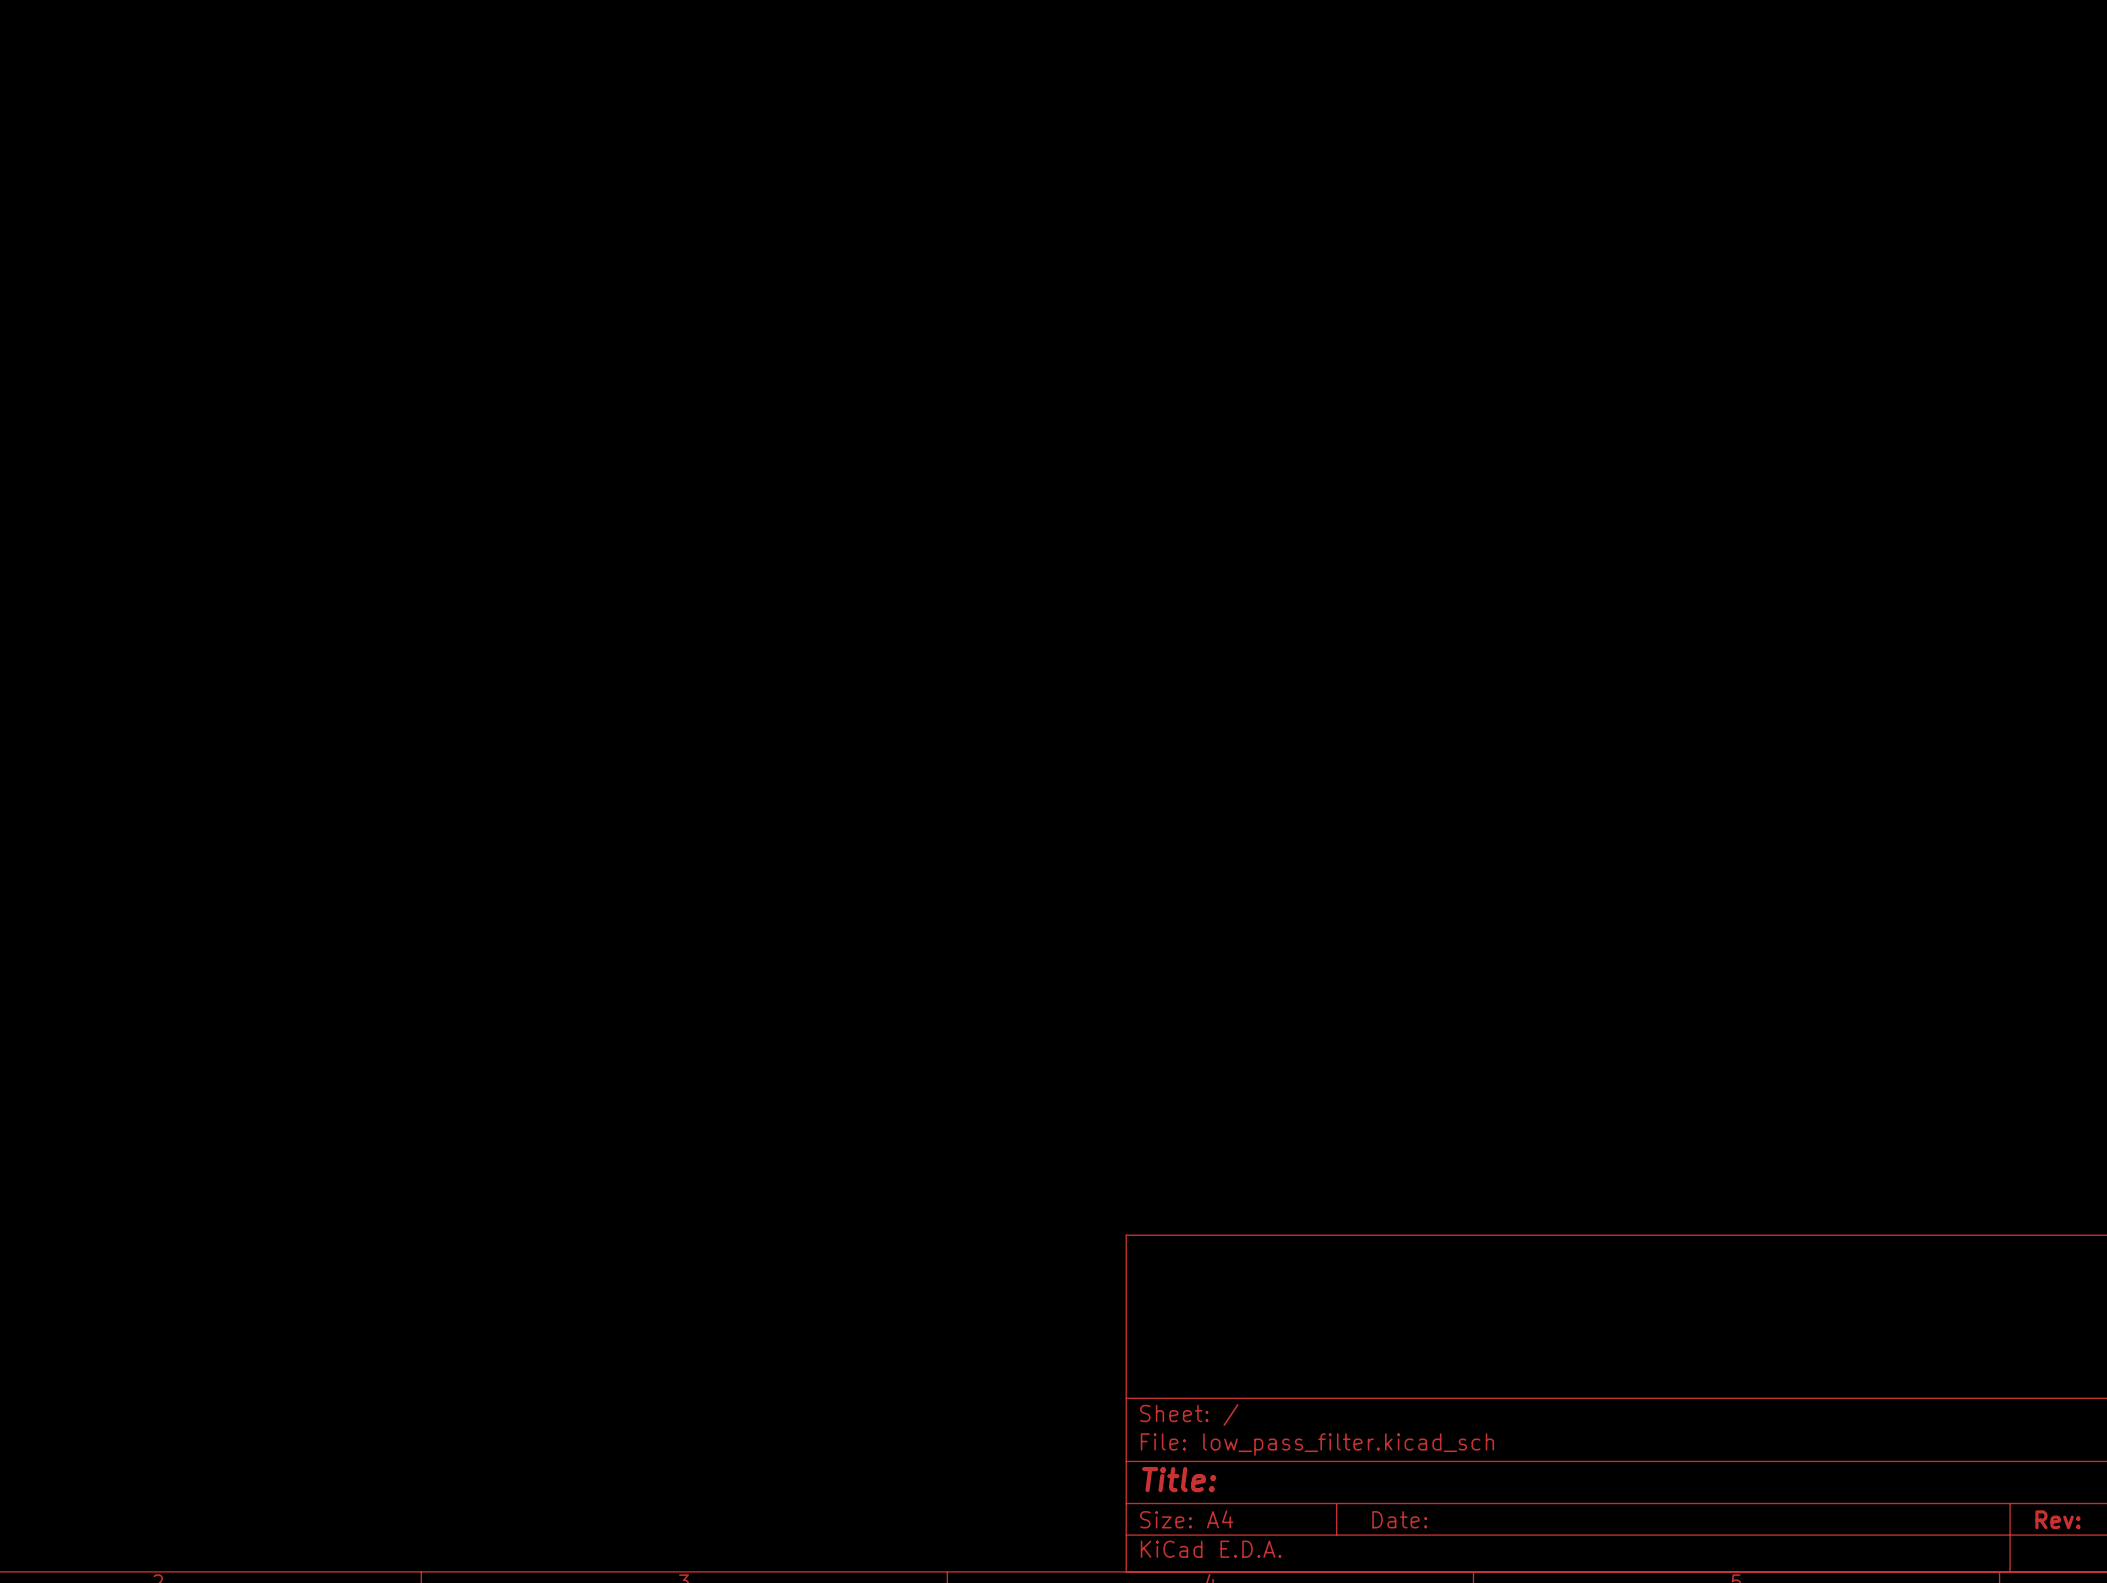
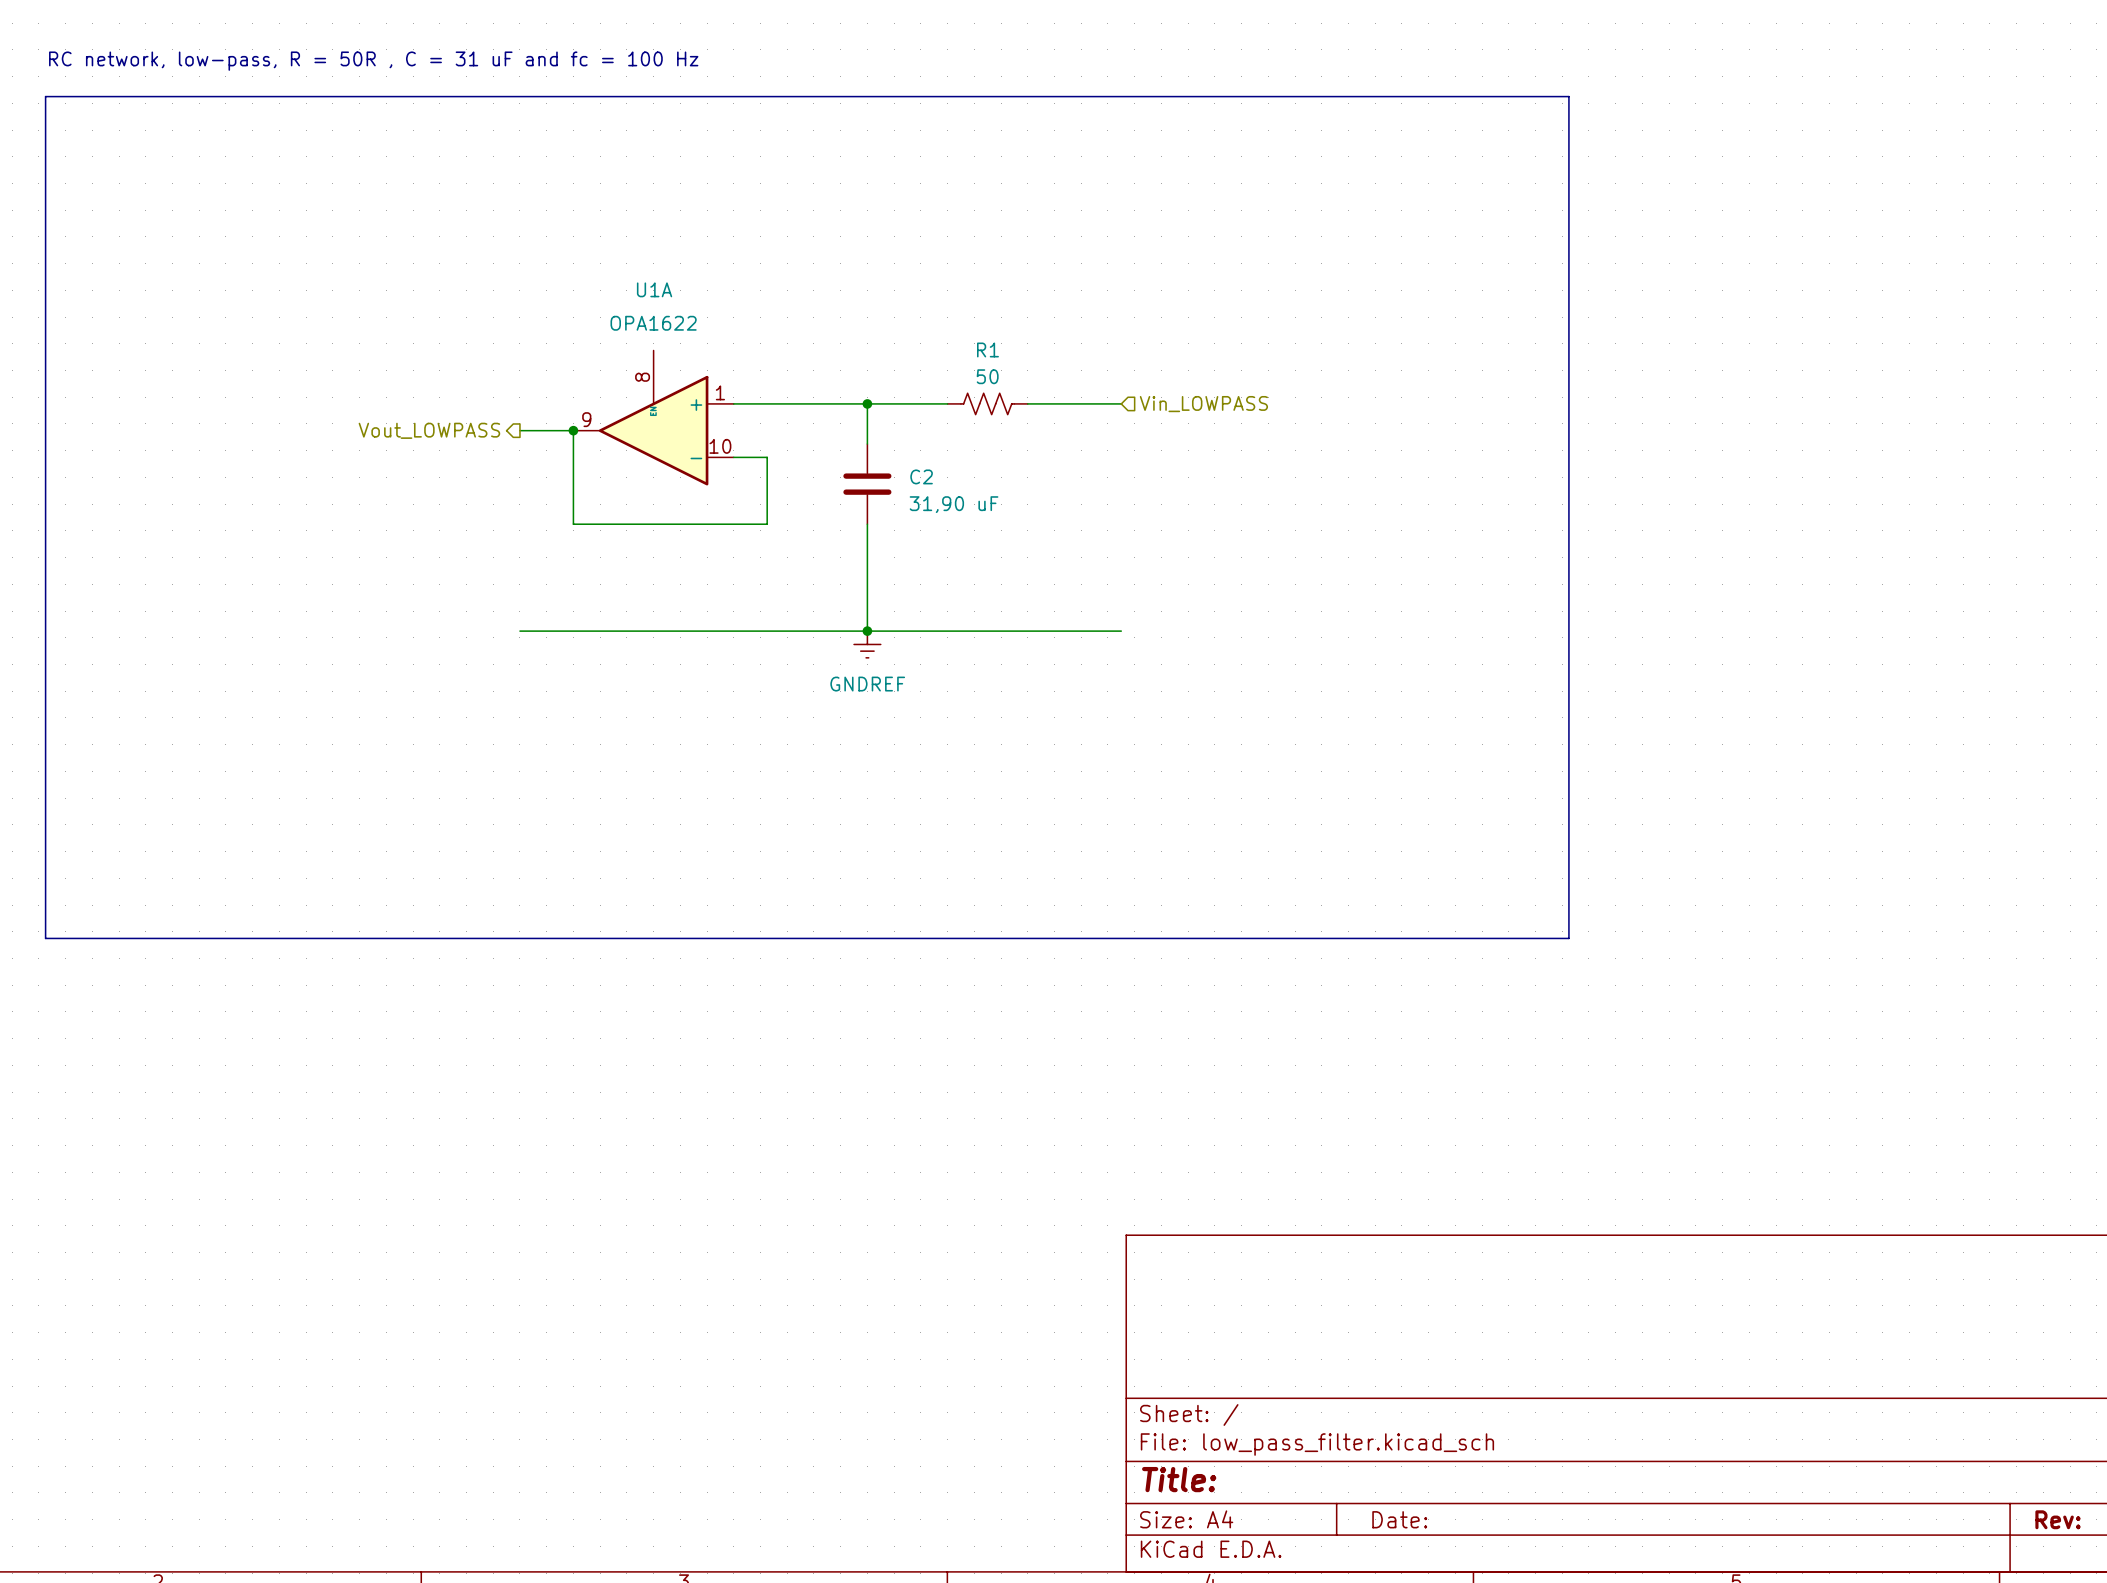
text: none -> RC network, low-pass, R = 50R , C = 31 uF and fc = 100 Hz (373, 61)
line: none -> (45, 96) (1568, 96) (1568, 938) (45, 938) (45, 96)
wire: none -> (733, 403) (947, 403)
wire: none -> (867, 403) (867, 444)
junction: none -> (867, 403)
R1: none -> 50 (987, 403)
wire: none -> (1027, 403) (1121, 403)
hierarchical label: none -> Vin_LOWPASS (1203, 404)
U1A: none -> OPA1622 (653, 417)
hierarchical label: none -> Vout_LOWPASS (429, 430)
wire: none -> (519, 430) (573, 430) (573, 524) (767, 524) (767, 457) (733, 457)
junction: none -> (573, 430)
C2: none -> 31,90 uF (867, 484)
wire: none -> (867, 524) (867, 631)
wire: none -> (519, 631) (1121, 631)
junction: none -> (867, 631)
power symbol: none -> GNDREF (867, 644)

